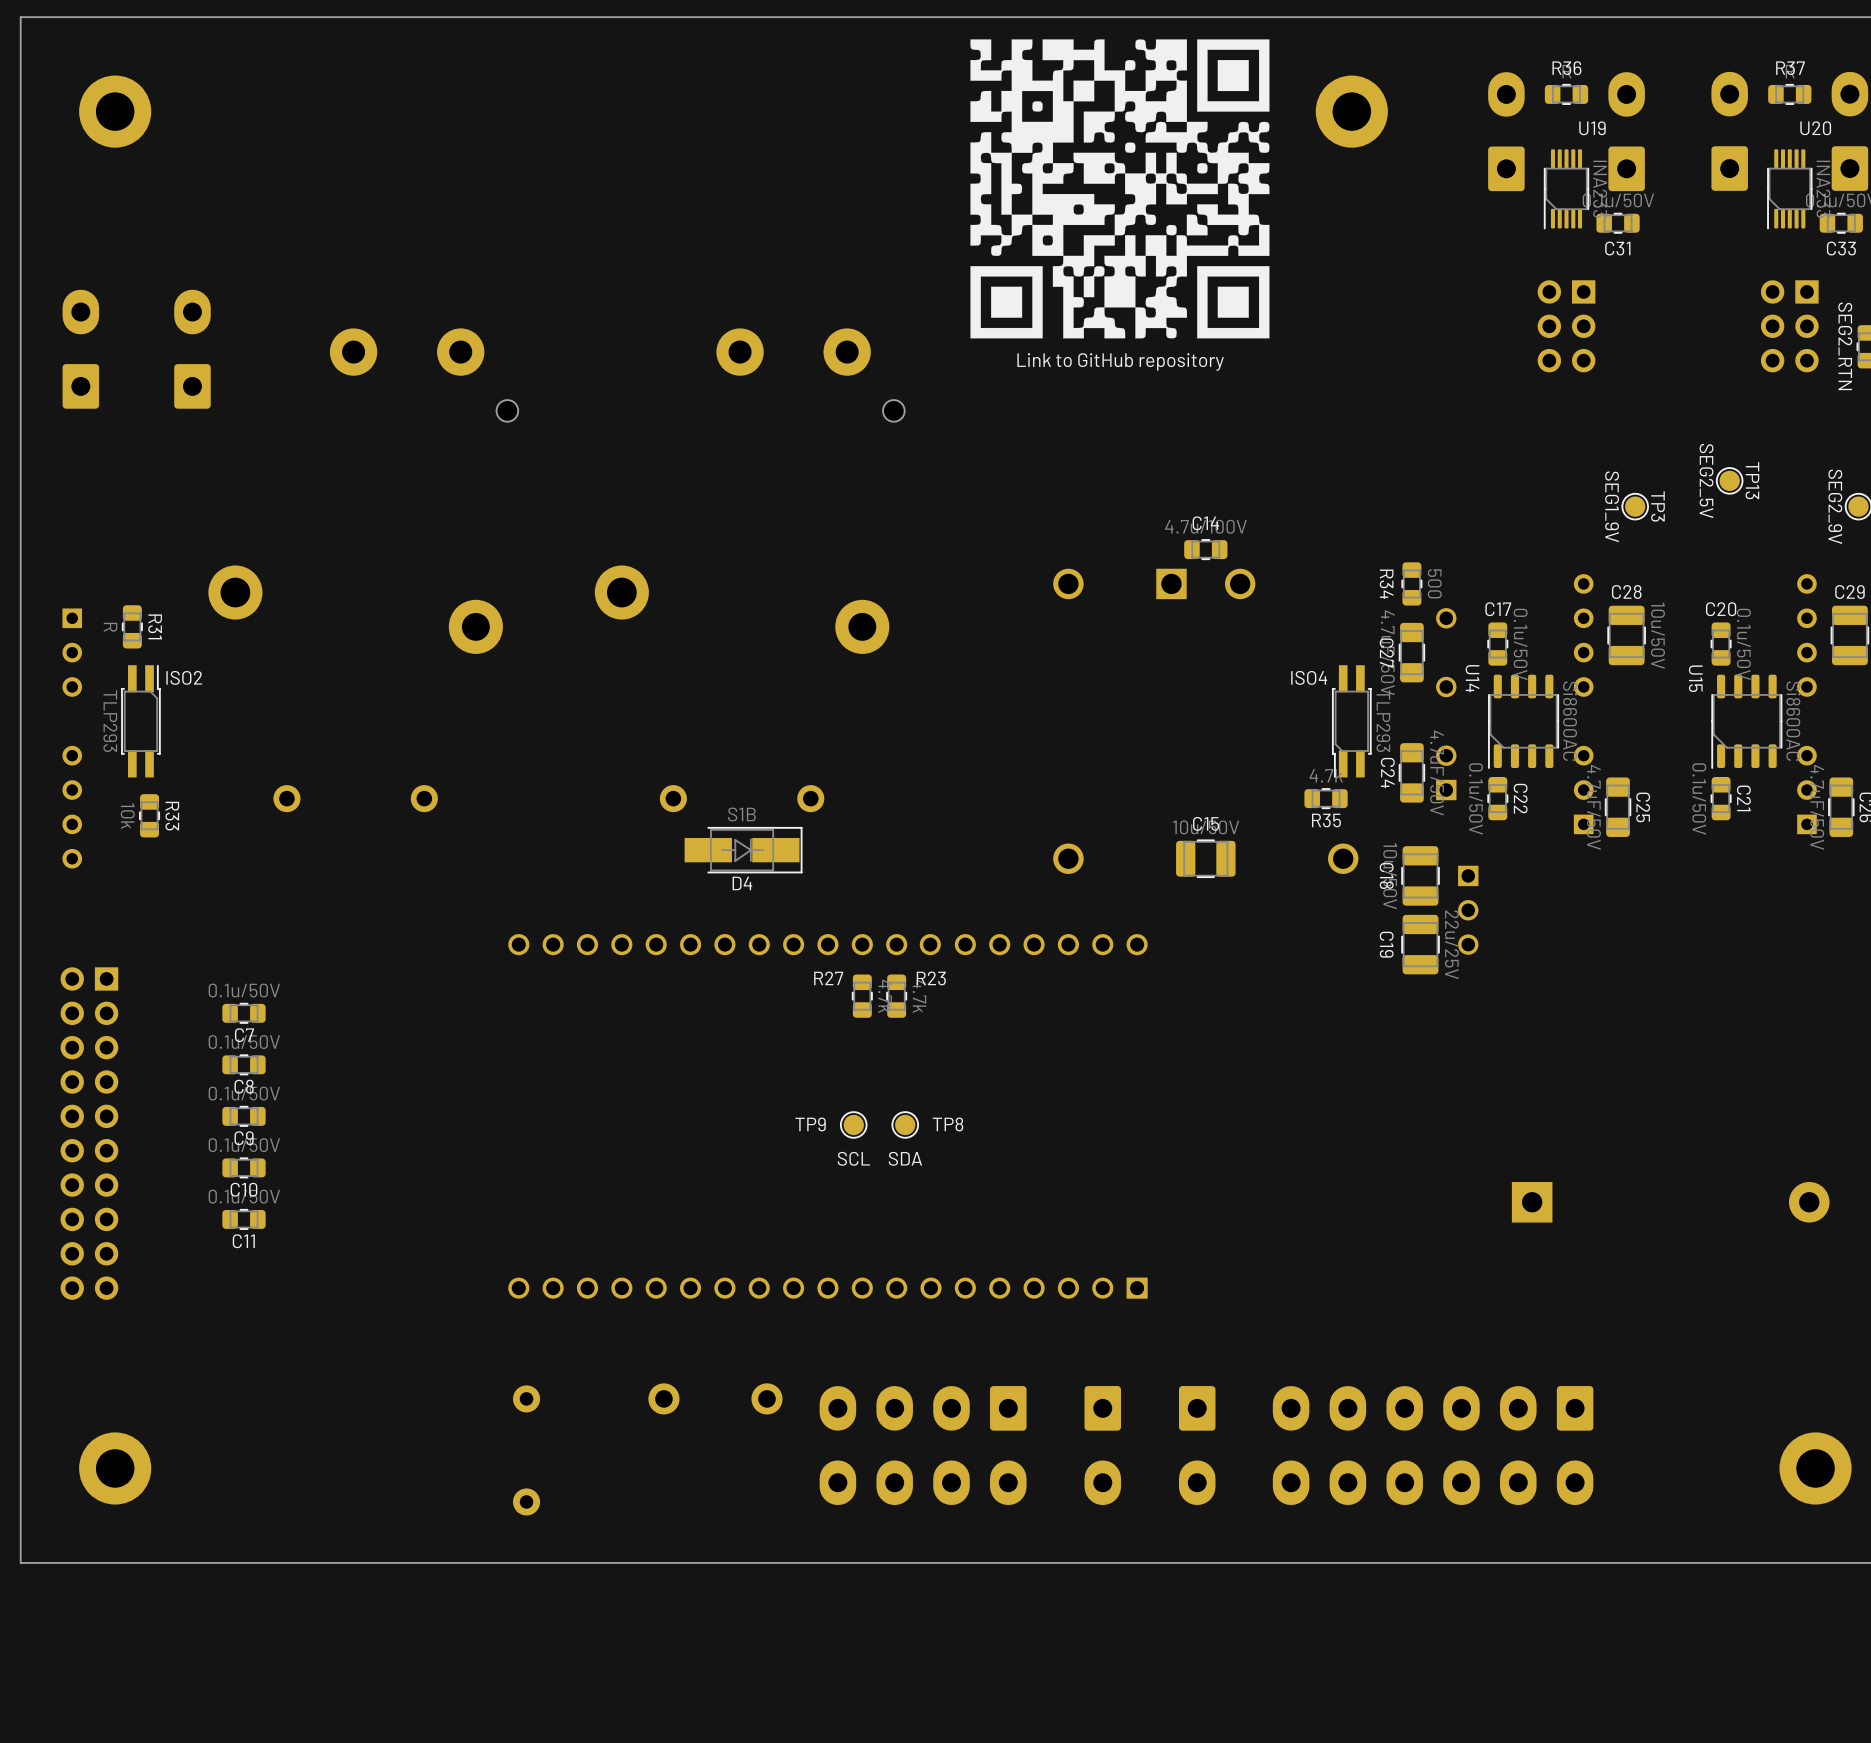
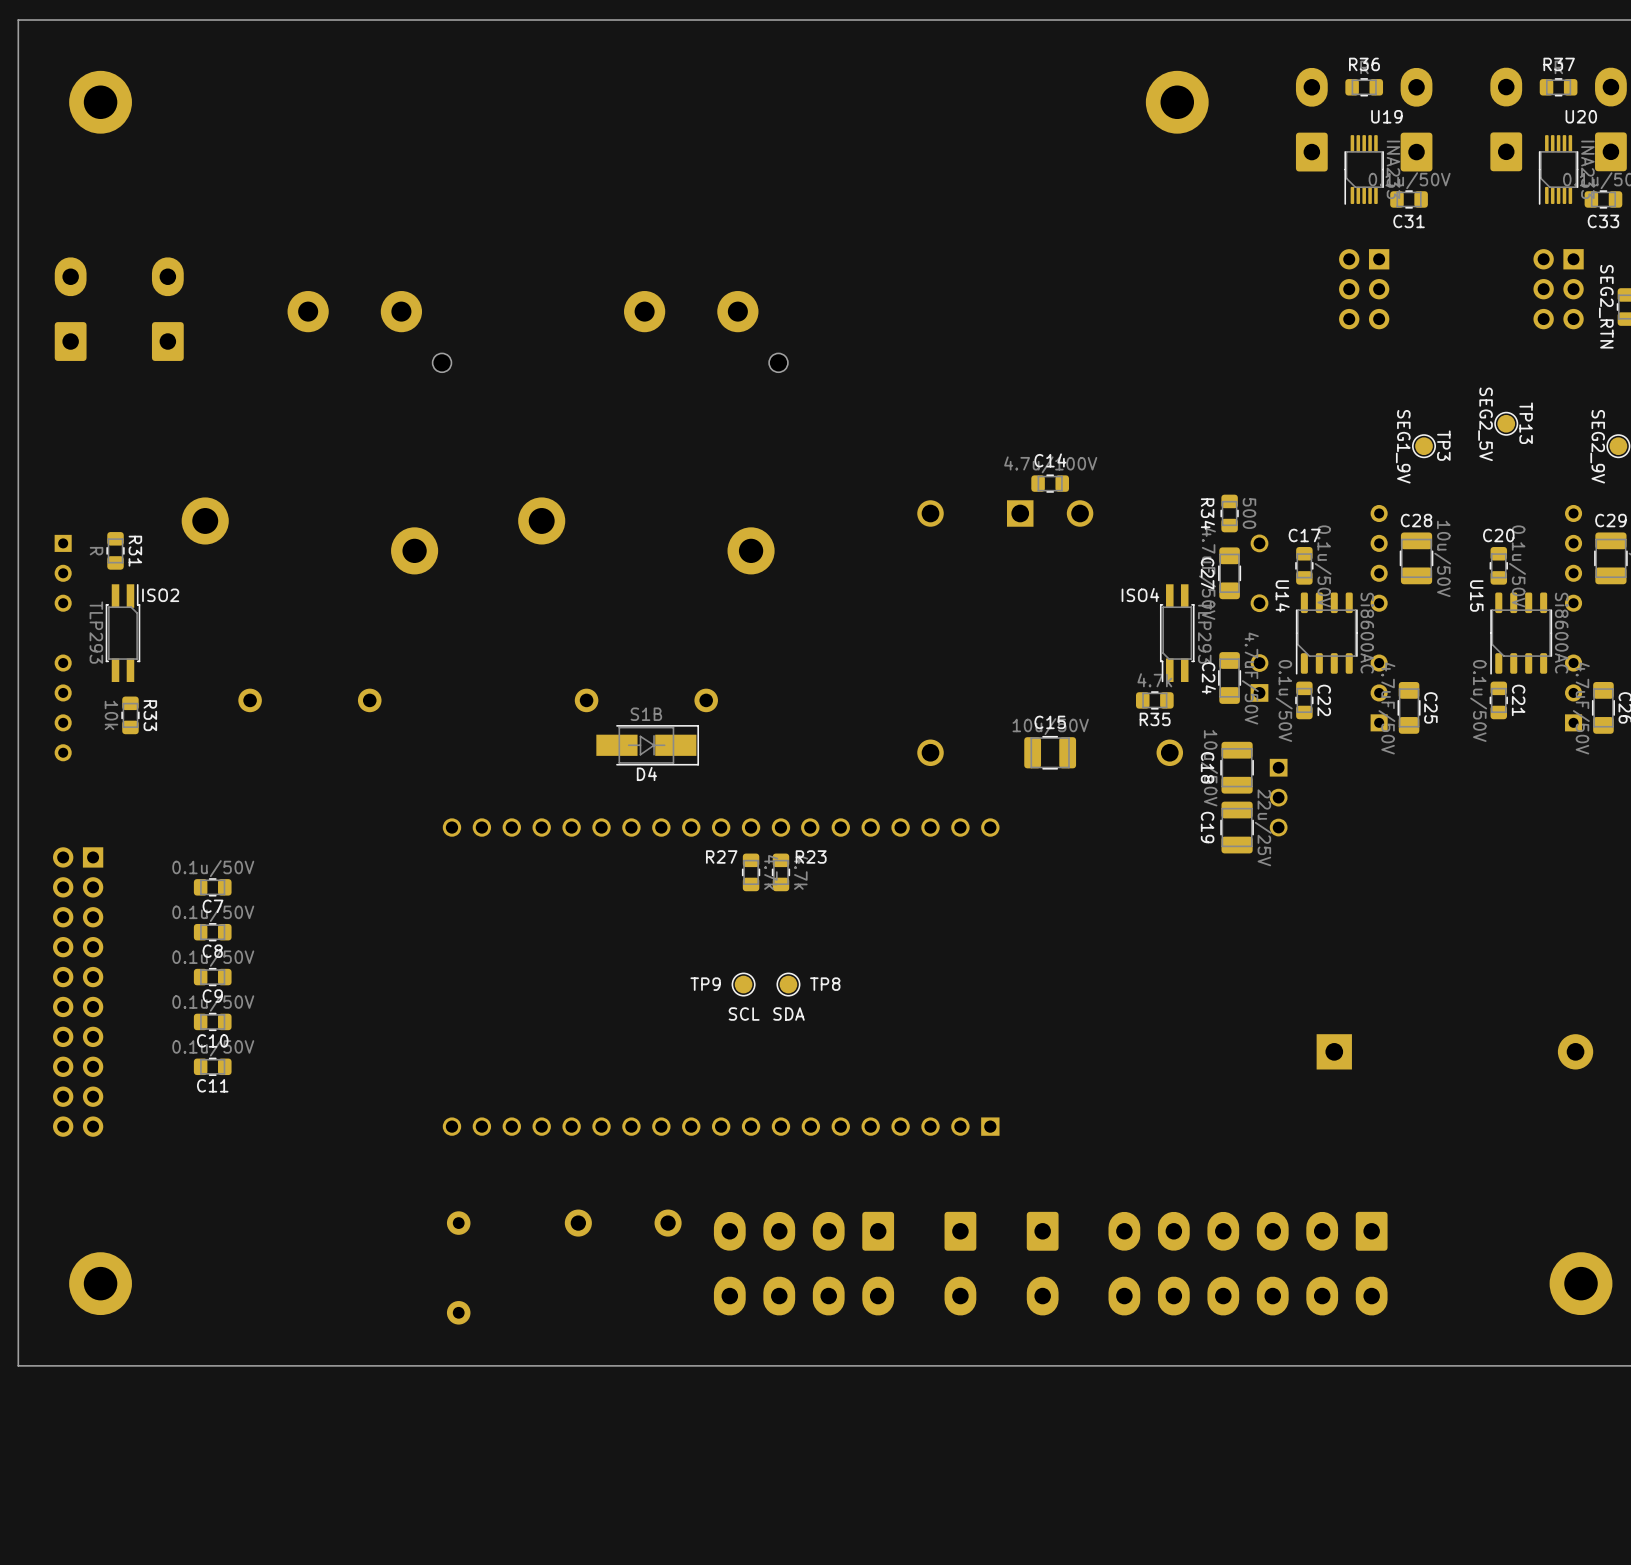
drawing: [970, 39, 1270, 339] -> none
text: Link to GitHub repository (1120, 361) -> none

